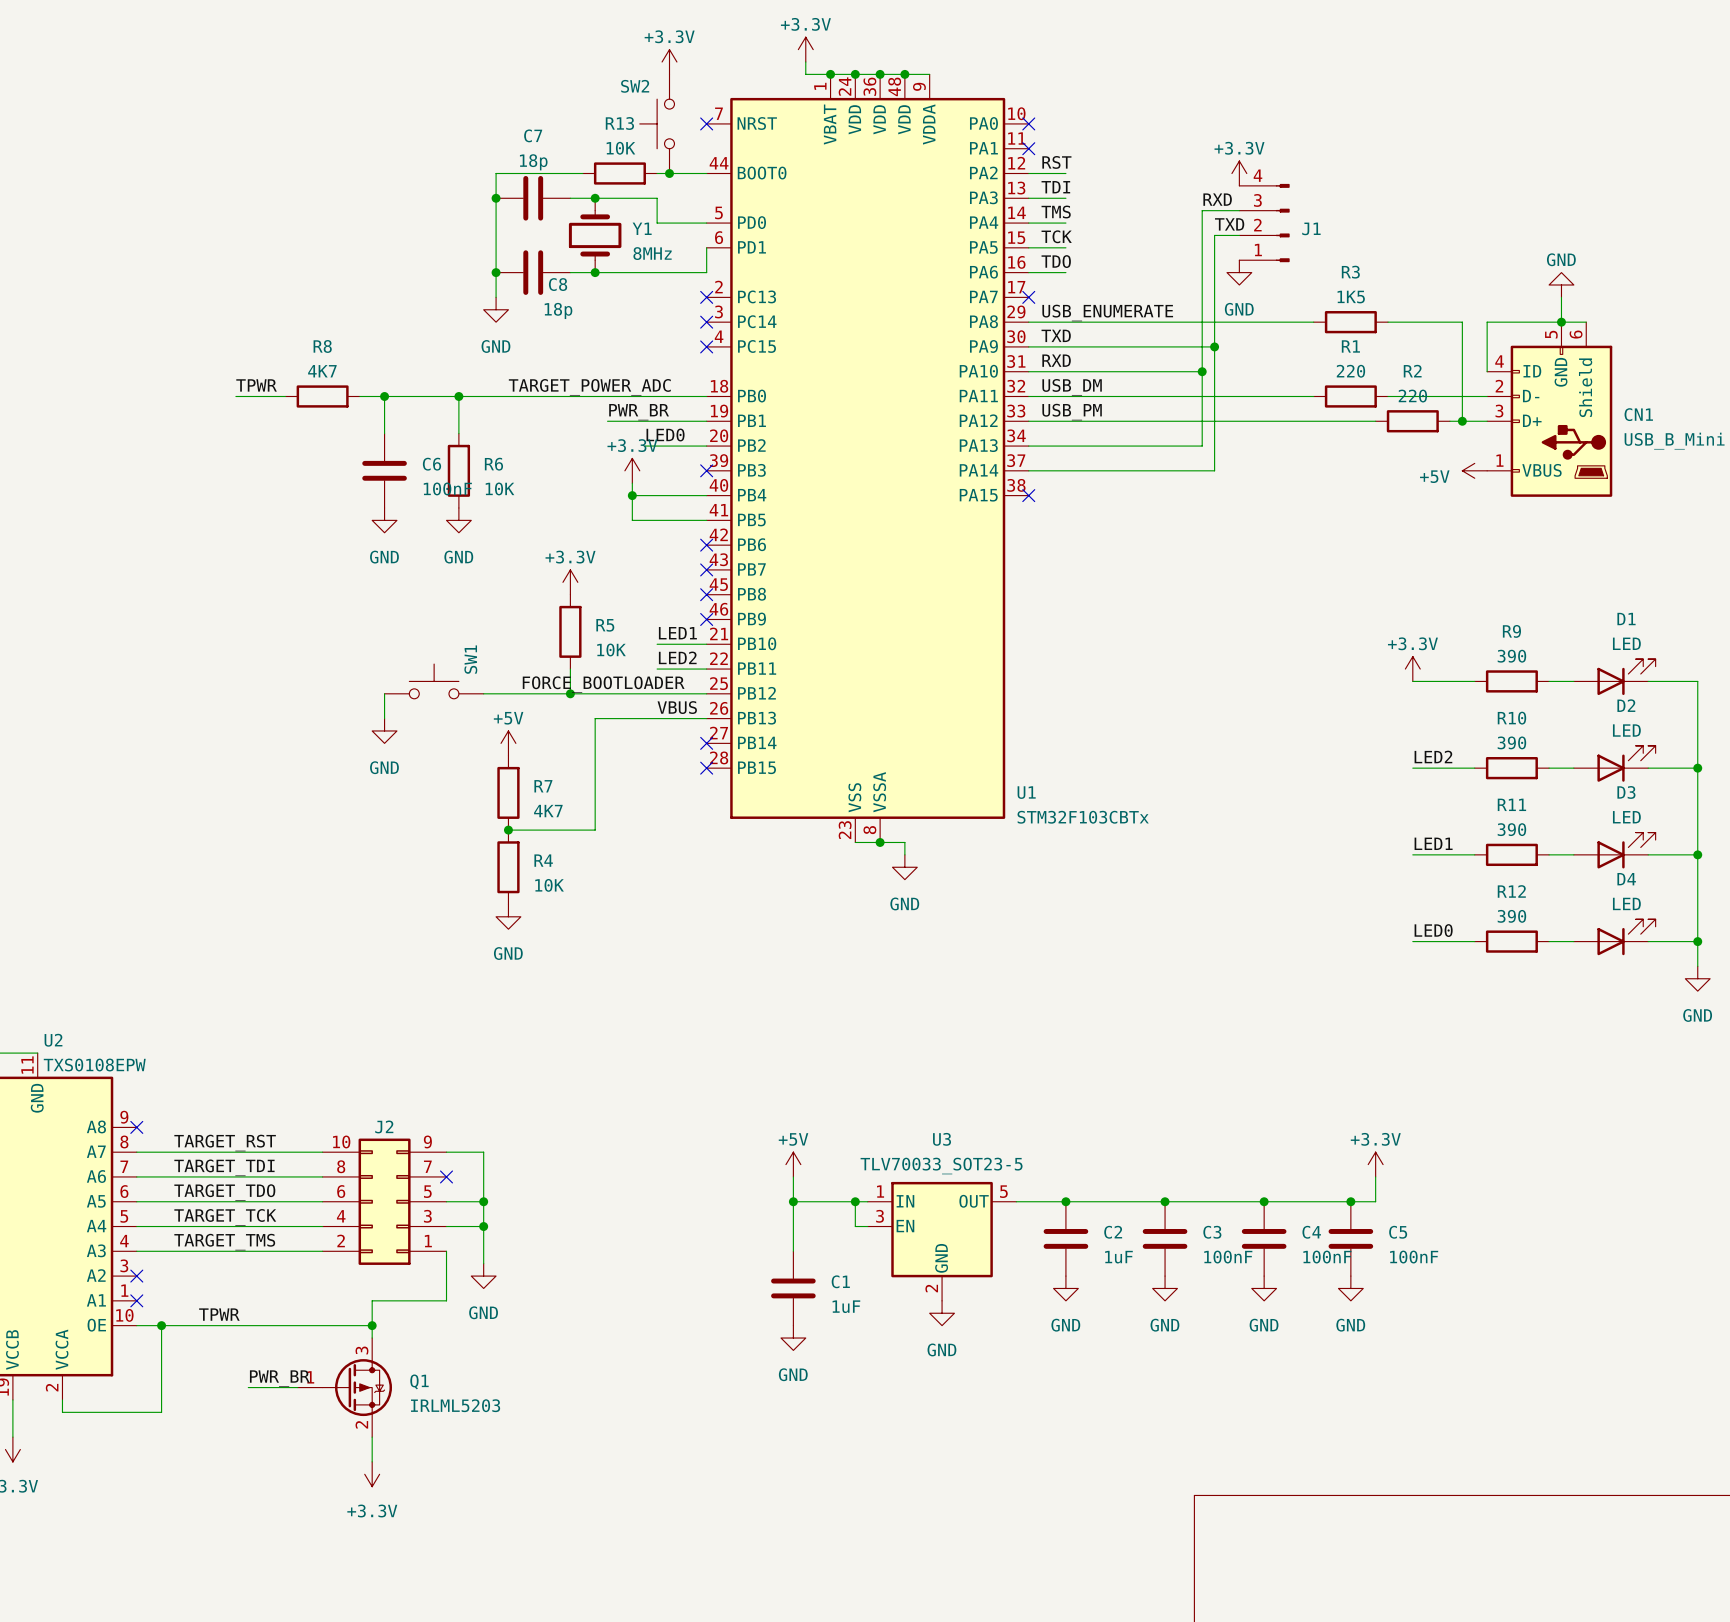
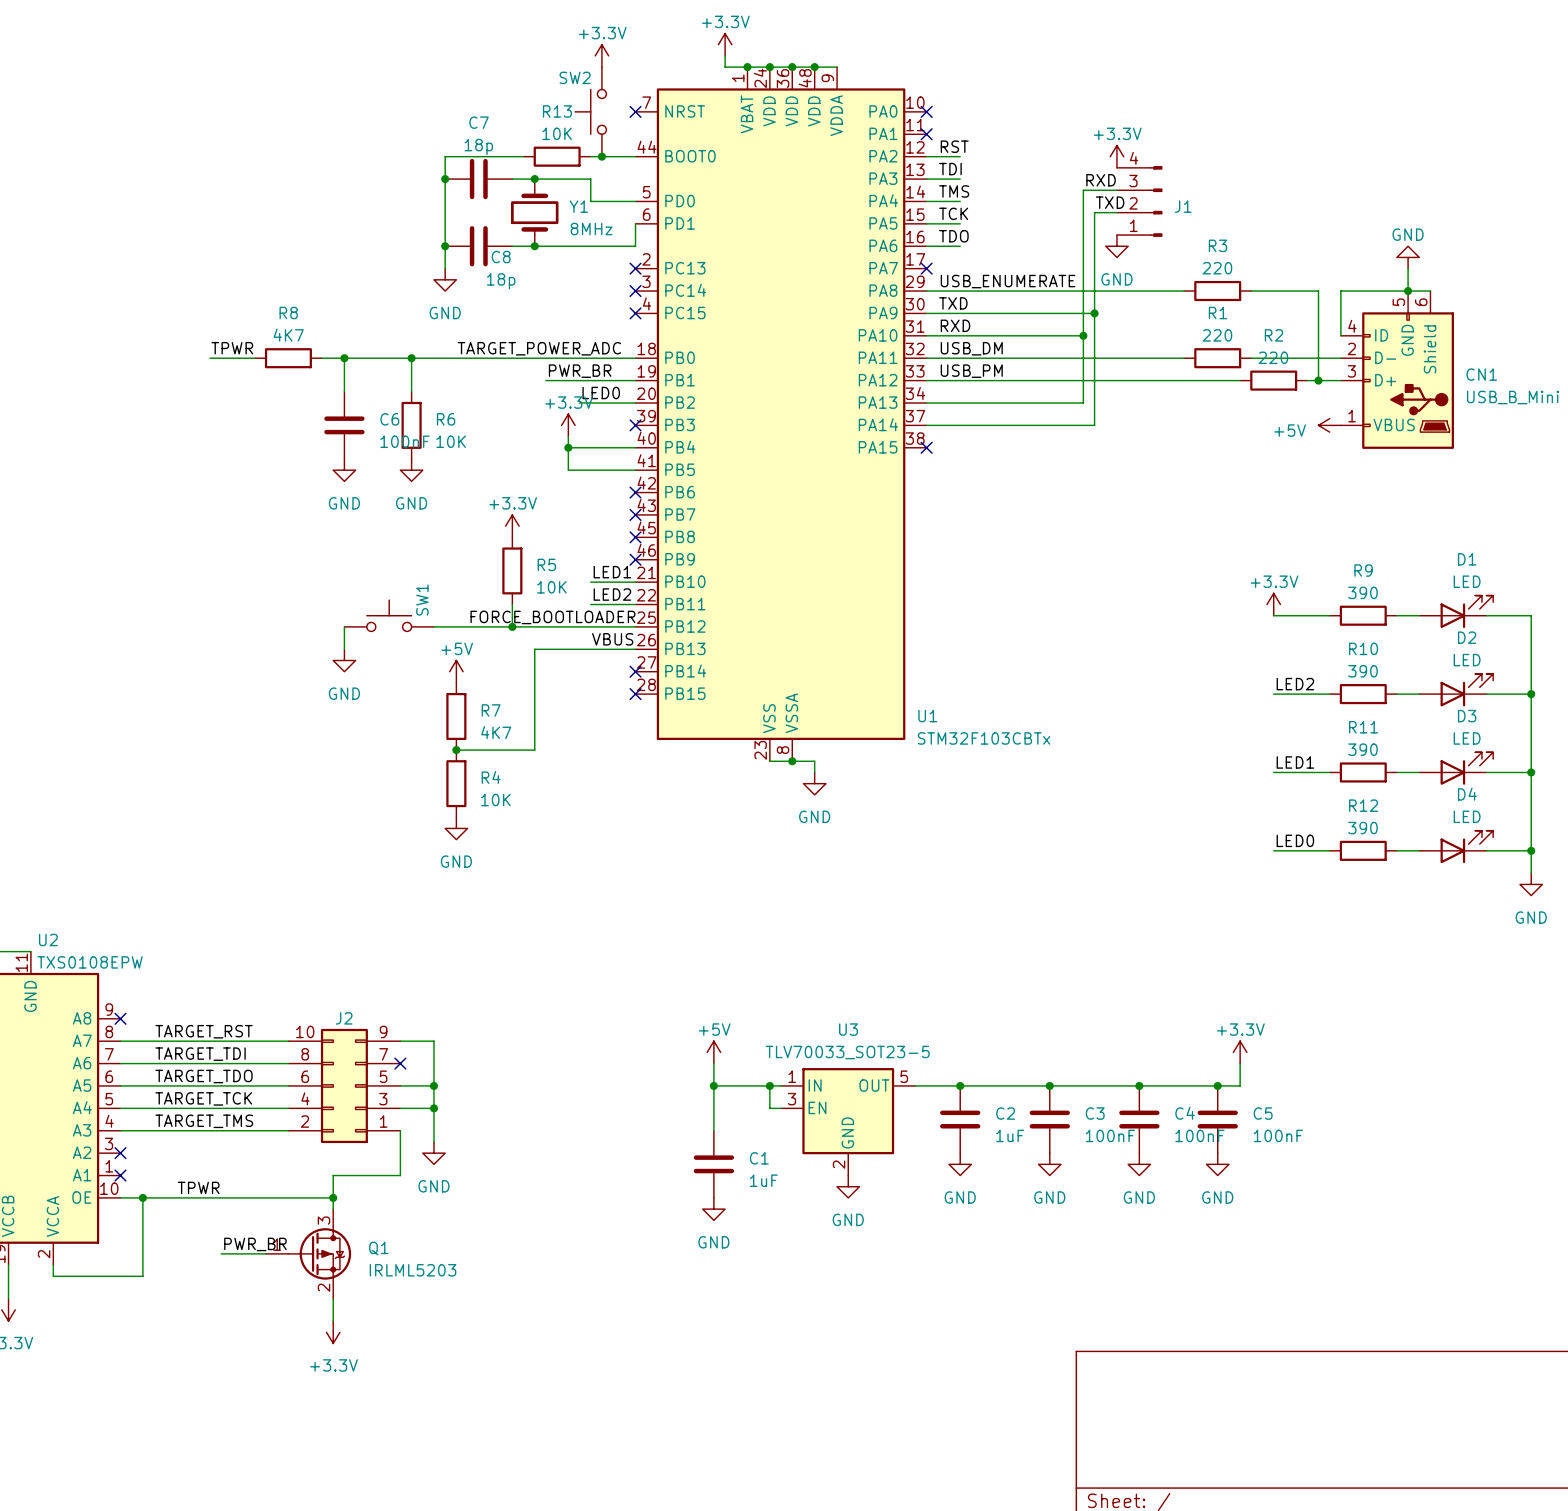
R3 value: 1K5 (1351, 297) -> 220 (1217, 268)

